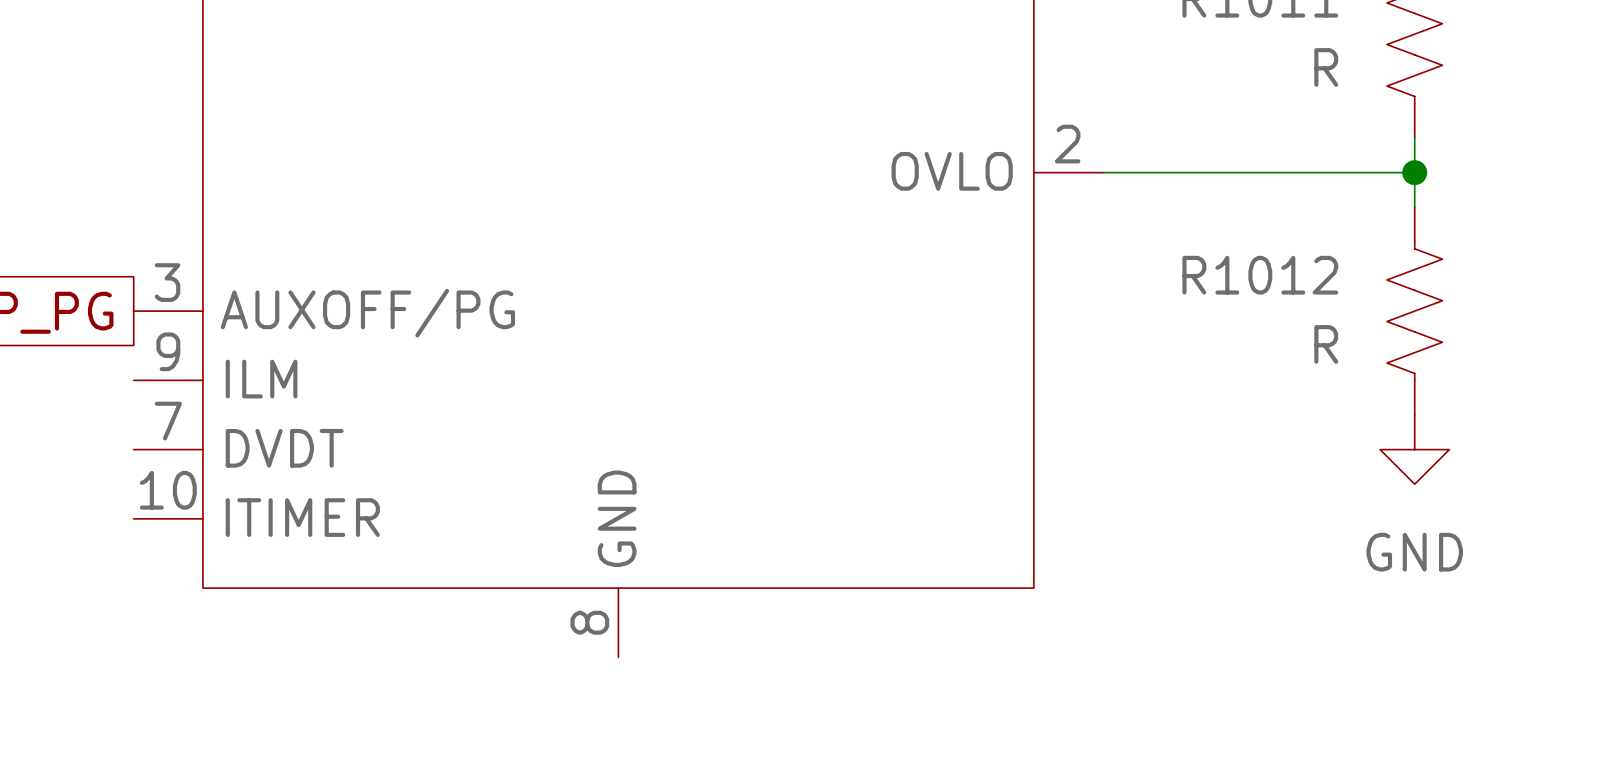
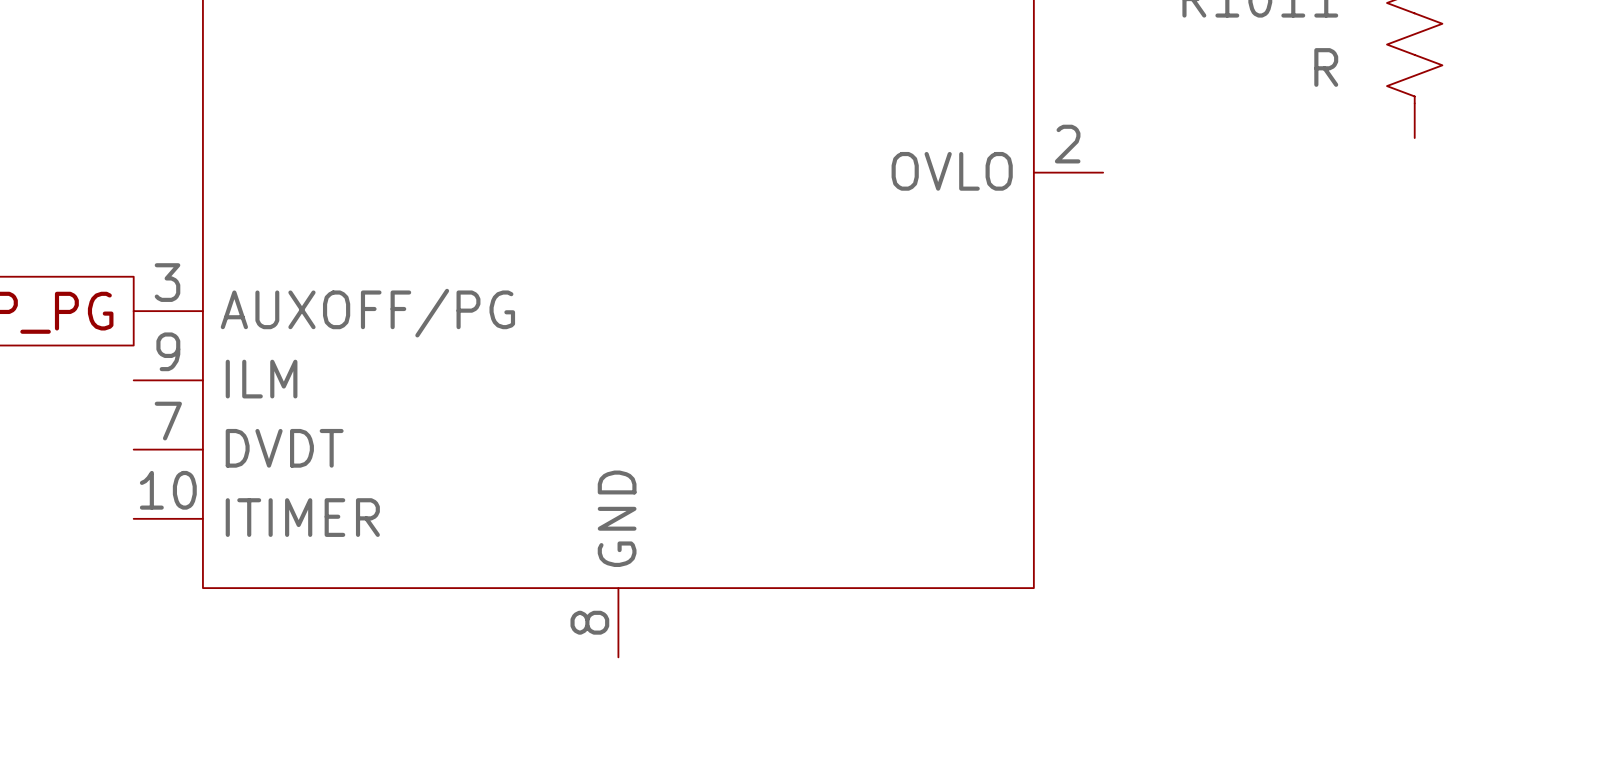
wire: (1414, 138) (1414, 207) -> none
wire: (1103, 172) (1414, 172) -> none
junction: (1414, 172) -> none
R1012: R (1414, 311) -> none
power symbol: GND (1414, 449) -> none

